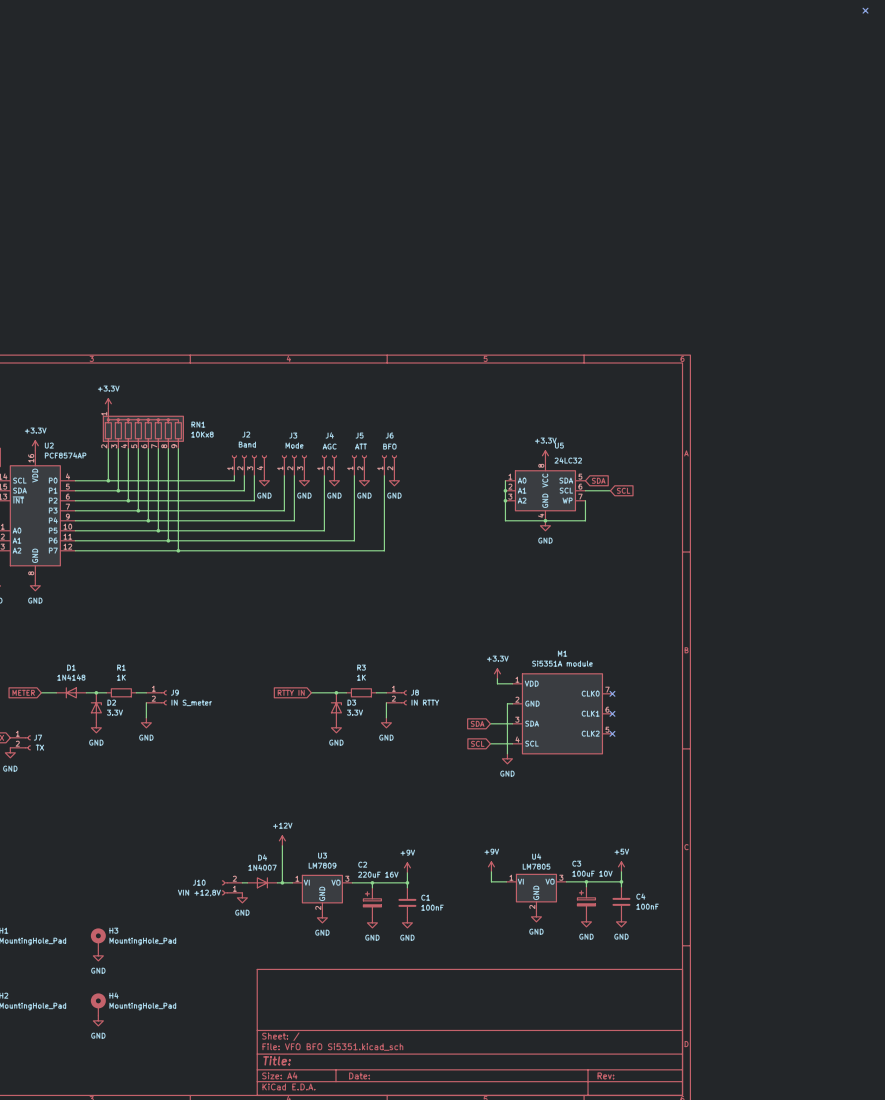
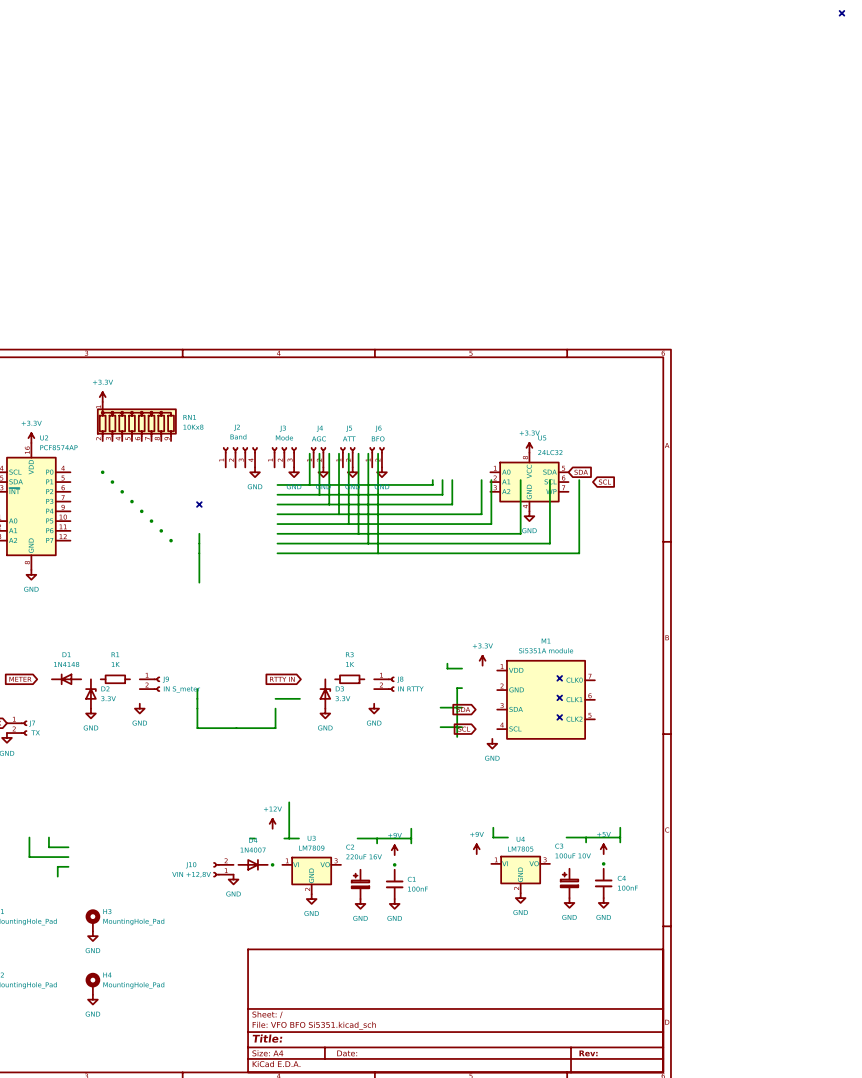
wire: (108, 448) (108, 480) -> none
wire: (118, 448) (118, 490) -> none
wire: (128, 448) (128, 500) -> none
wire: (138, 448) (138, 510) -> none
wire: (148, 448) (148, 520) -> none
wire: (158, 448) (158, 530) -> none
wire: (168, 448) (168, 540) -> none
wire: (178, 448) (178, 550) -> none
wire: none -> (309, 453) (309, 484)
wire: none -> (319, 453) (319, 494)
wire: none -> (329, 453) (329, 504)
wire: none -> (339, 453) (339, 514)
wire: none -> (348, 453) (348, 524)
wire: none -> (358, 453) (358, 533)
wire: none -> (368, 453) (368, 543)
wire: none -> (378, 453) (378, 553)
wire: (234, 475) (234, 480) (75, 480) -> none
wire: (244, 475) (244, 490) (75, 490) -> none
wire: (254, 475) (254, 500) (75, 500) -> none
wire: (284, 475) (284, 510) (75, 510) -> none
wire: (294, 475) (294, 520) (75, 520) -> none
wire: (324, 475) (324, 530) (75, 530) -> none
wire: (354, 475) (354, 540) (75, 540) -> none
wire: (384, 475) (384, 550) (75, 550) -> none
wire: (505, 480) (505, 520) (585, 520) (585, 500) -> none
wire: none -> (432, 480) (432, 484) (277, 484)
wire: none -> (442, 480) (442, 494) (277, 494)
wire: none -> (452, 480) (452, 504) (277, 504)
wire: none -> (481, 480) (481, 514) (277, 514)
wire: none -> (491, 480) (491, 524) (277, 524)
wire: none -> (520, 480) (520, 533) (277, 533)
wire: none -> (549, 480) (549, 543) (277, 543)
wire: none -> (579, 480) (579, 553) (277, 553)
junction: (505, 490) -> none
wire: (585, 490) (610, 490) -> none
junction: (505, 500) -> none
no-connect mark: none -> (199, 504)
junction: (545, 520) -> none
wire: none -> (199, 533) (199, 582)
wire: (497, 678) (497, 683) (512, 683) -> (447, 663) (447, 668) (462, 668)
no-connect mark: none -> (559, 678)
wire: (41, 692) (56, 692) -> none
wire: (86, 692) (106, 692) -> none
junction: (96, 692) -> none
wire: (136, 692) (146, 692) -> none
wire: (311, 692) (346, 692) -> none
junction: (336, 692) -> none
wire: (376, 692) (386, 692) -> none
no-connect mark: (612, 693) -> none
wire: (146, 702) (146, 717) -> none
wire: none -> (197, 689) (197, 728) (275, 728) (275, 708)
wire: (386, 702) (386, 717) -> none
wire: (512, 703) (507, 703) (507, 753) -> (462, 688) (457, 688) (457, 736)
no-connect mark: none -> (559, 697)
wire: none -> (275, 698) (299, 698)
no-connect mark: (612, 713) -> none
wire: (490, 723) (512, 723) -> (440, 707) (462, 707)
no-connect mark: none -> (559, 717)
no-connect mark: (612, 733) -> none
wire: (490, 743) (512, 743) -> (440, 727) (462, 727)
wire: (282, 845) (282, 882) -> (289, 802) (289, 838)
wire: none -> (29, 837) (29, 857) (68, 857)
wire: none -> (48, 837) (48, 847) (68, 847)
wire: (491, 871) (491, 881) (506, 881) -> (493, 827) (493, 837) (507, 837)
wire: (621, 871) (621, 886) -> (620, 827) (620, 842)
wire: (407, 872) (407, 887) -> (411, 828) (411, 843)
wire: (566, 881) (621, 881) -> (566, 837) (620, 837)
wire: (586, 881) (586, 886) -> (586, 837) (586, 842)
junction: (586, 881) -> none
wire: (242, 882) (247, 882) -> (250, 838) (255, 838)
wire: (277, 882) (292, 882) -> (284, 838) (298, 838)
wire: (352, 882) (407, 882) -> (357, 838) (411, 838)
wire: (372, 882) (372, 887) -> (377, 838) (377, 843)
junction: (372, 882) -> none
wire: none -> (68, 866) (57, 866) (57, 876)

